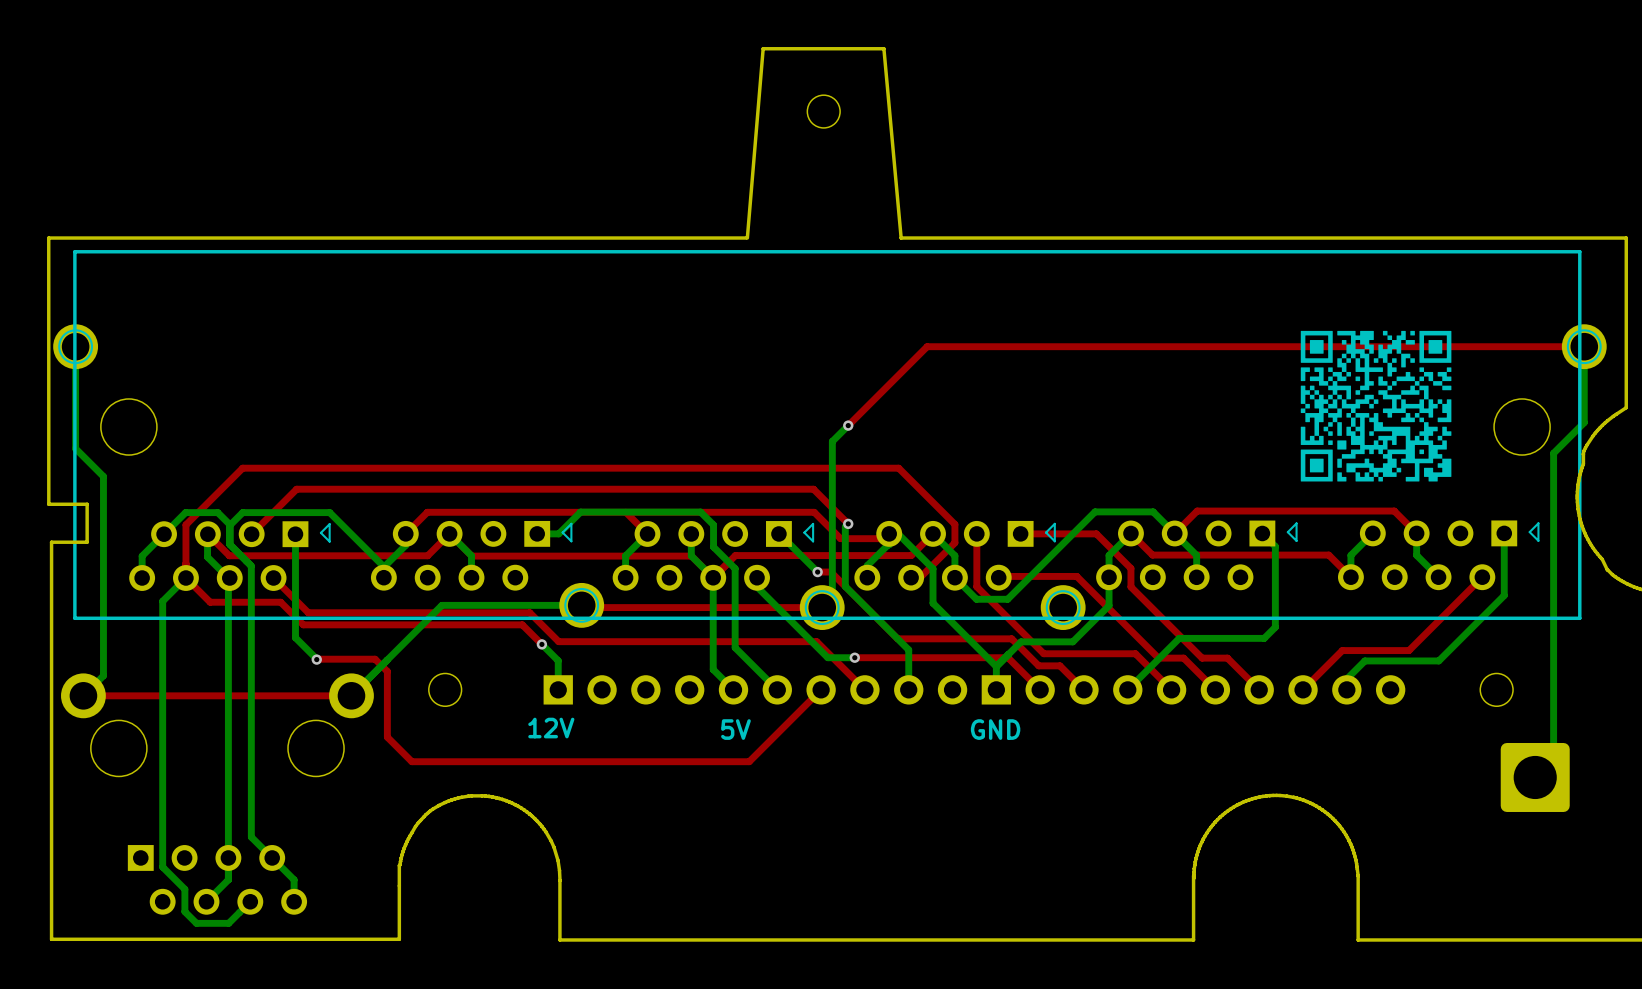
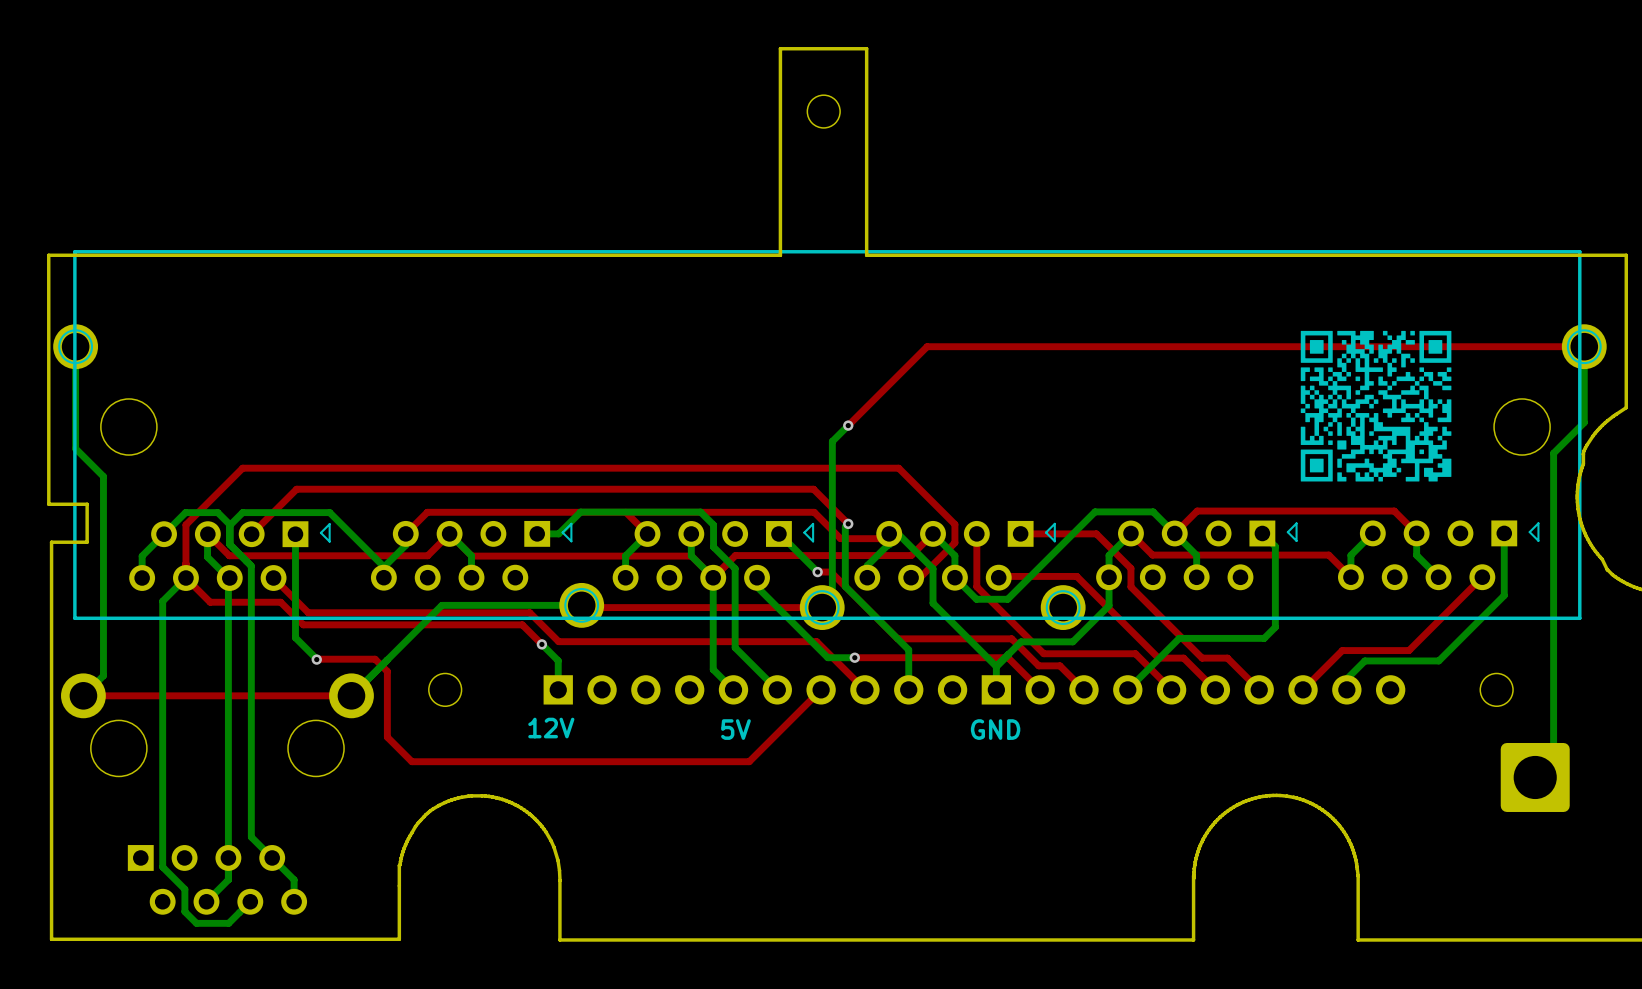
board edge: (780, 48) (763, 48) (747, 238) -> none
board edge: (866, 48) (883, 48) (901, 238) (1626, 238) (1626, 255) -> (866, 48) (866, 255) (1626, 255)
board edge: (745, 238) (48, 238) (48, 255) -> (780, 48) (780, 255) (48, 255)

